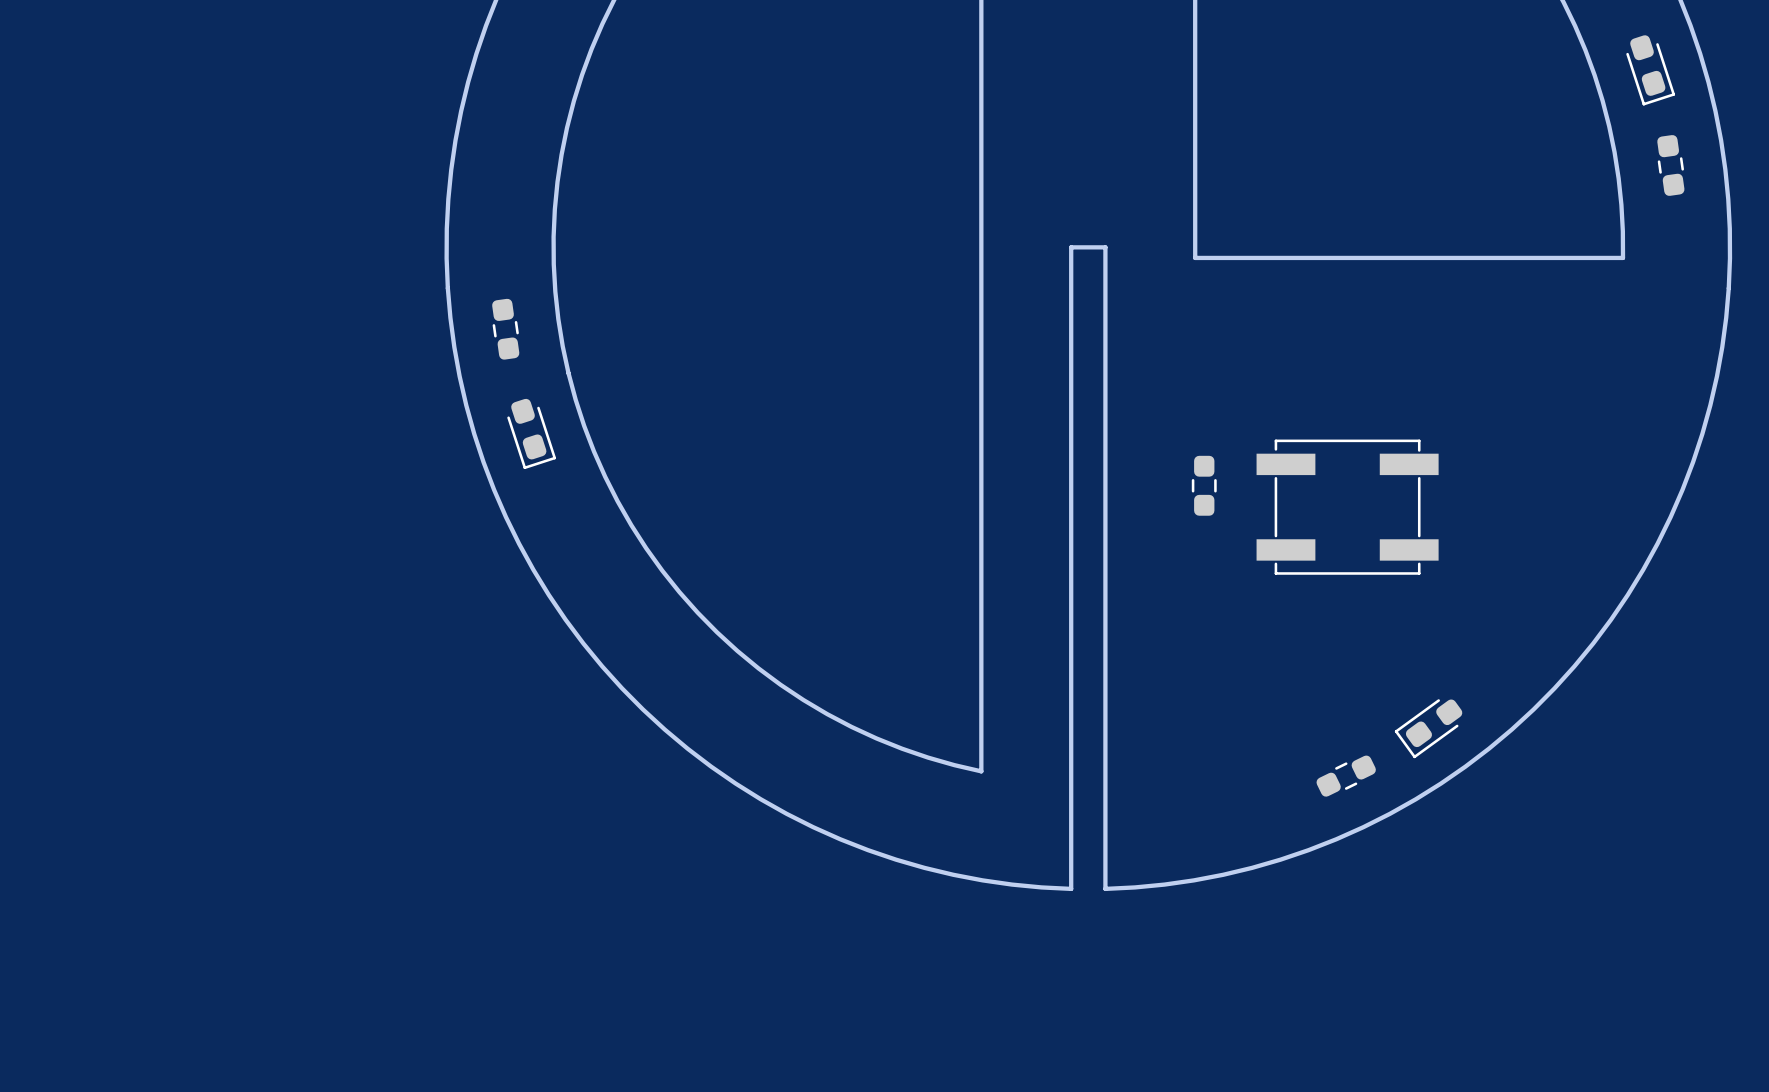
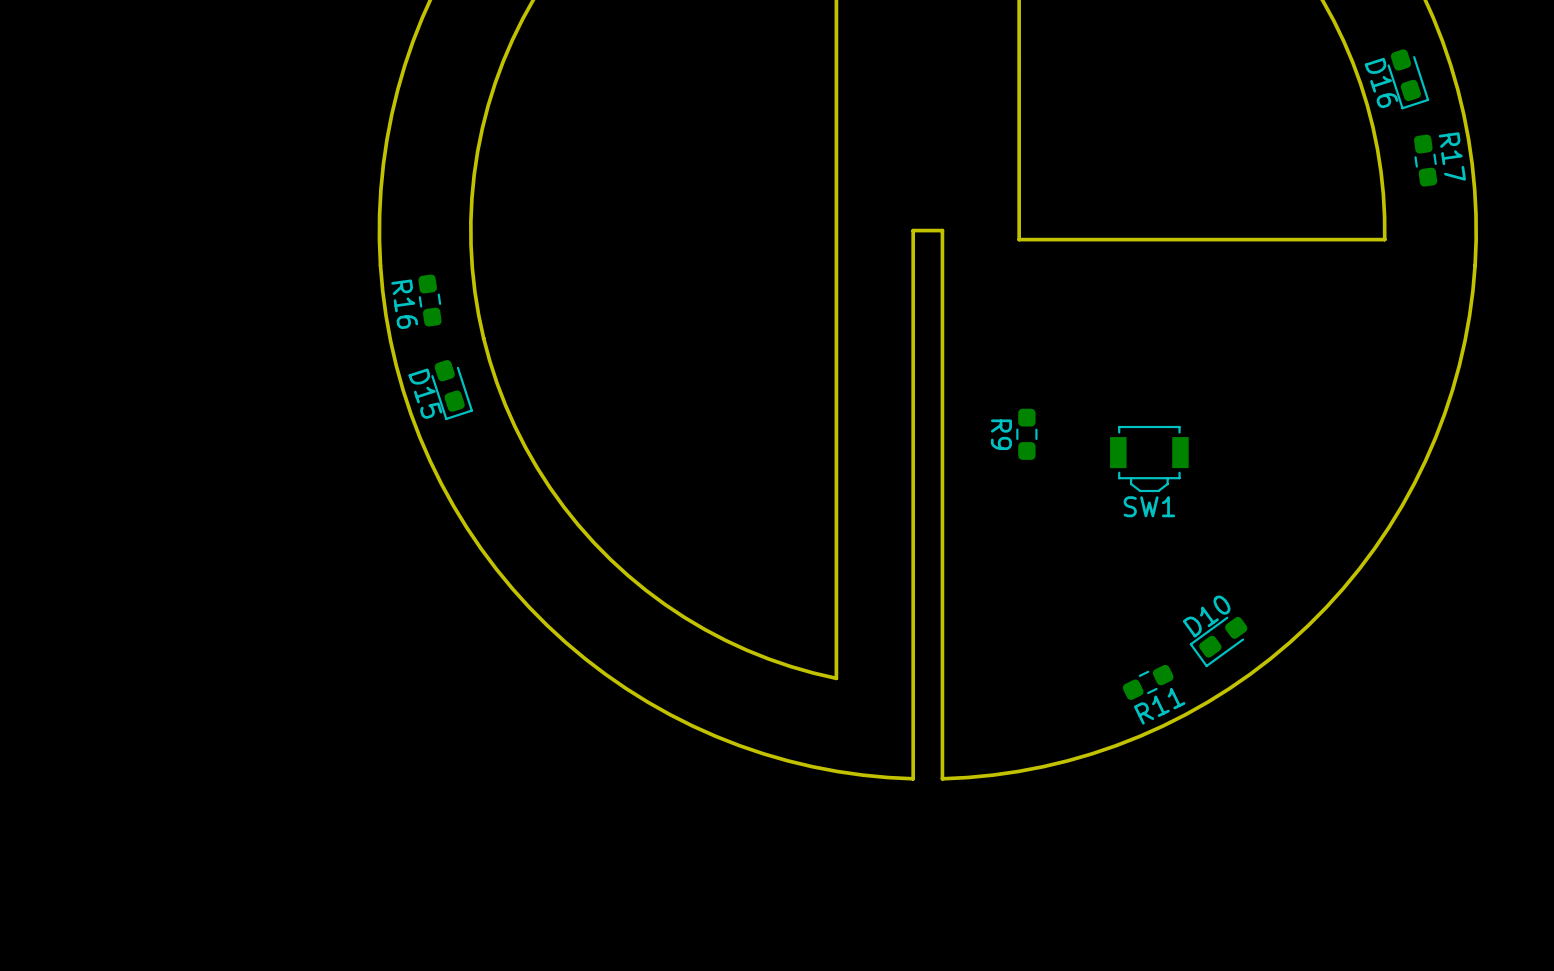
D16 name: none -> D16 (1381, 82)
R17 name: none -> R17 (1452, 156)
R16 name: none -> R16 (404, 304)
D15 name: none -> D15 (425, 393)
R9 name: none -> R9 (1001, 434)
part: (1347, 507) -> none
SW1: none -> (1149, 458)
D10 name: none -> D10 (1206, 616)
R11 name: none -> R11 (1159, 706)

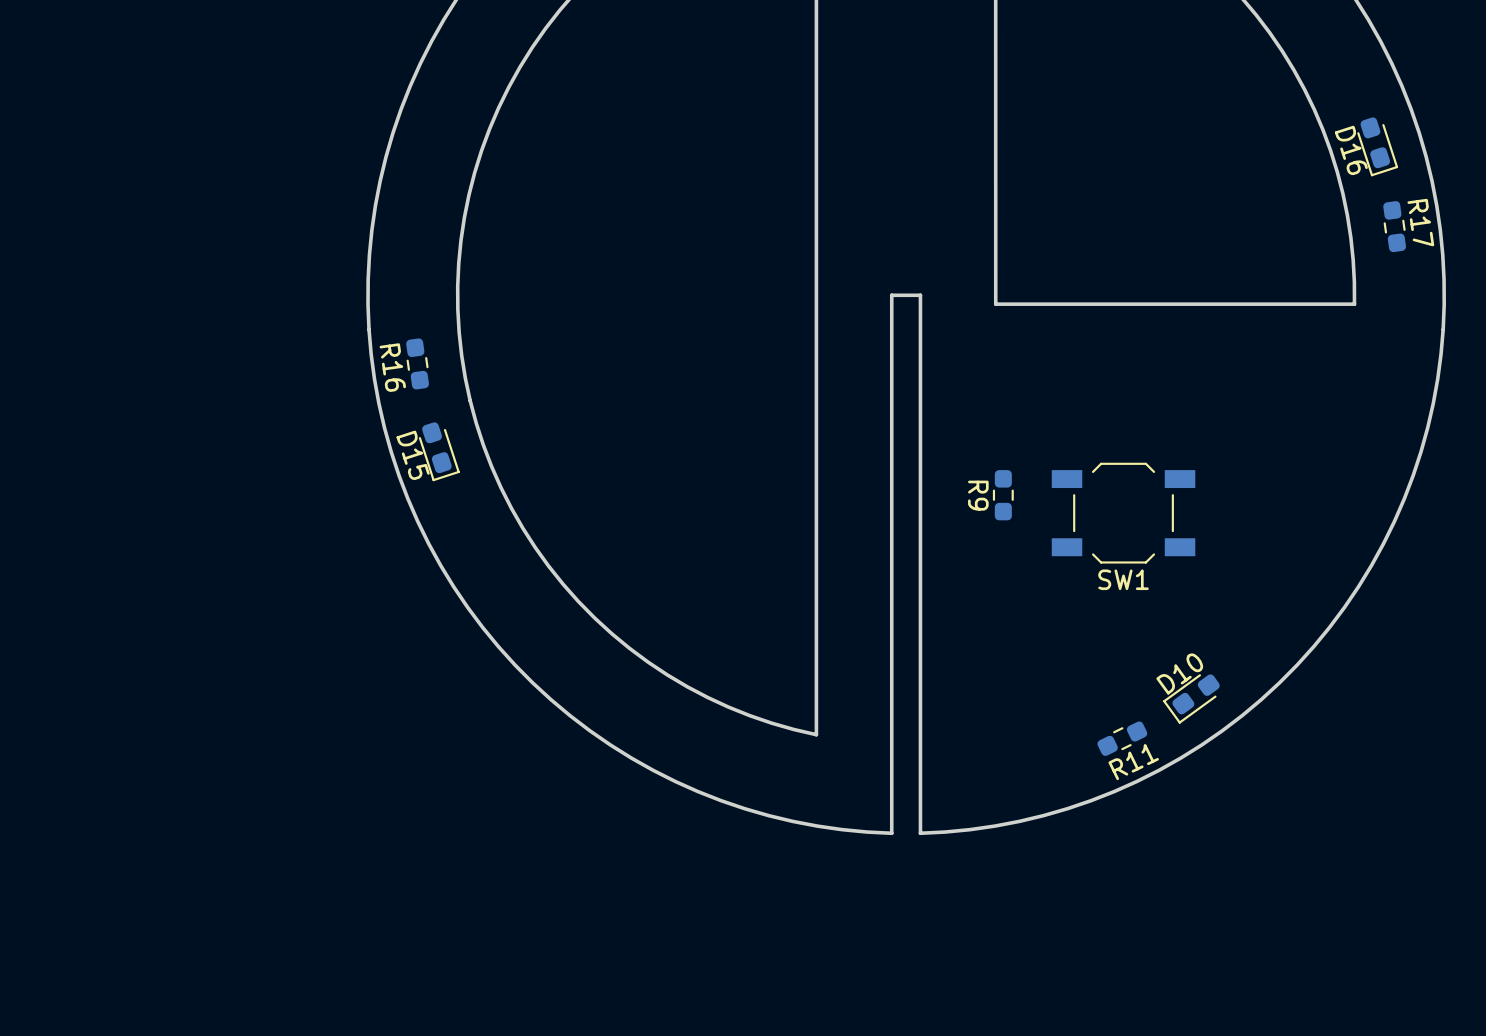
SW1 footprint: [1110, 425, 1189, 493] -> [1051, 462, 1196, 564]

